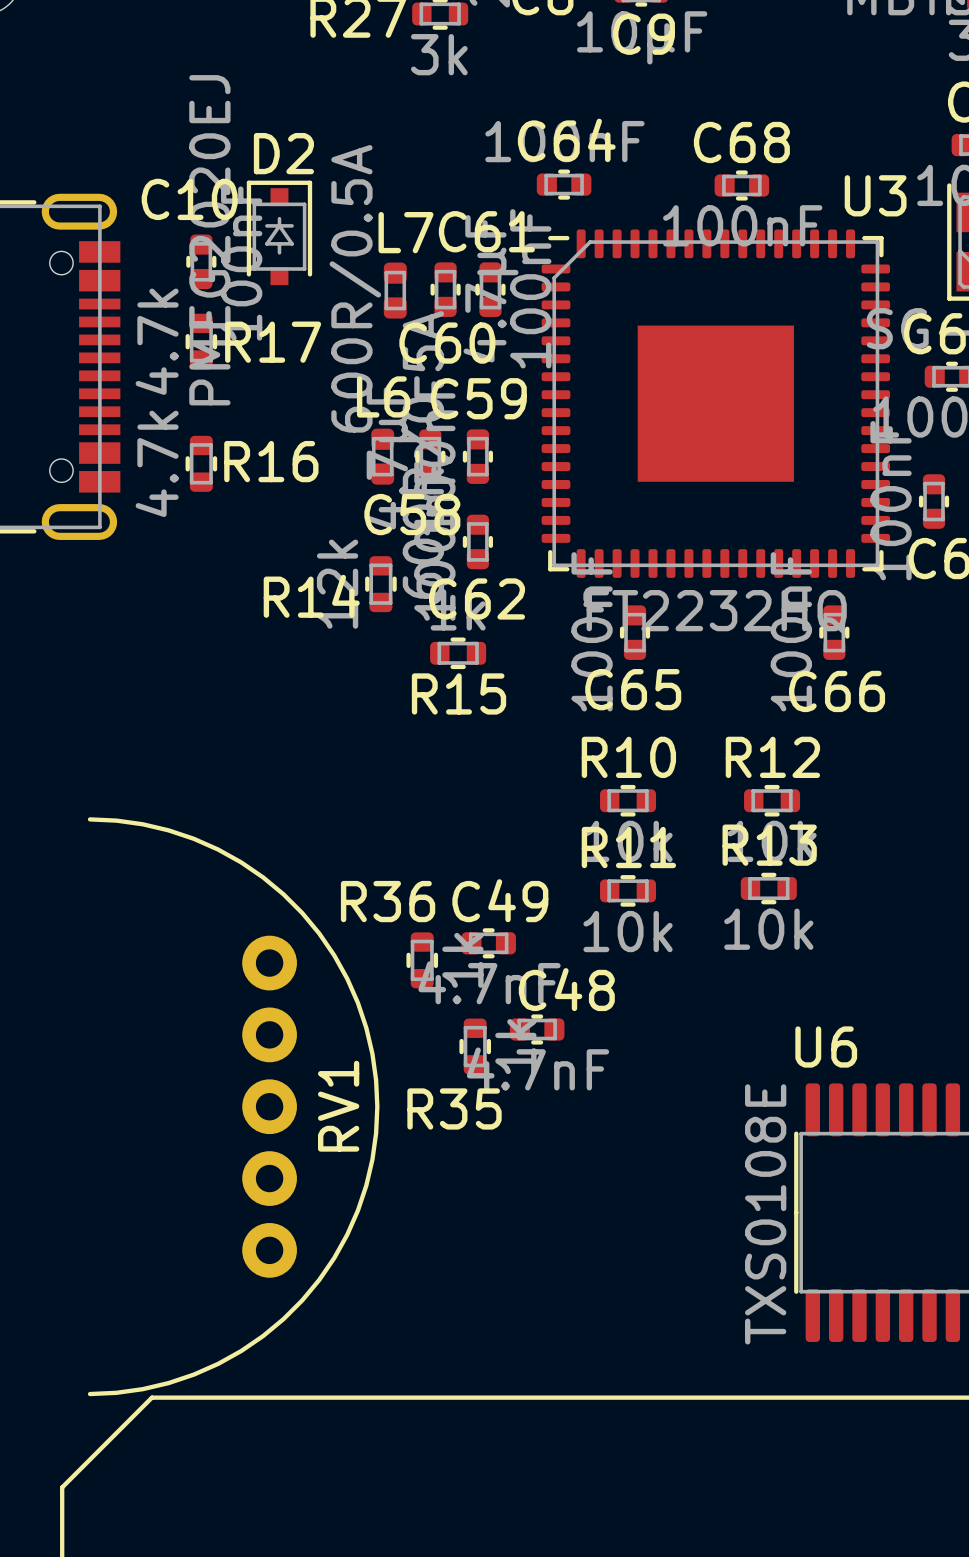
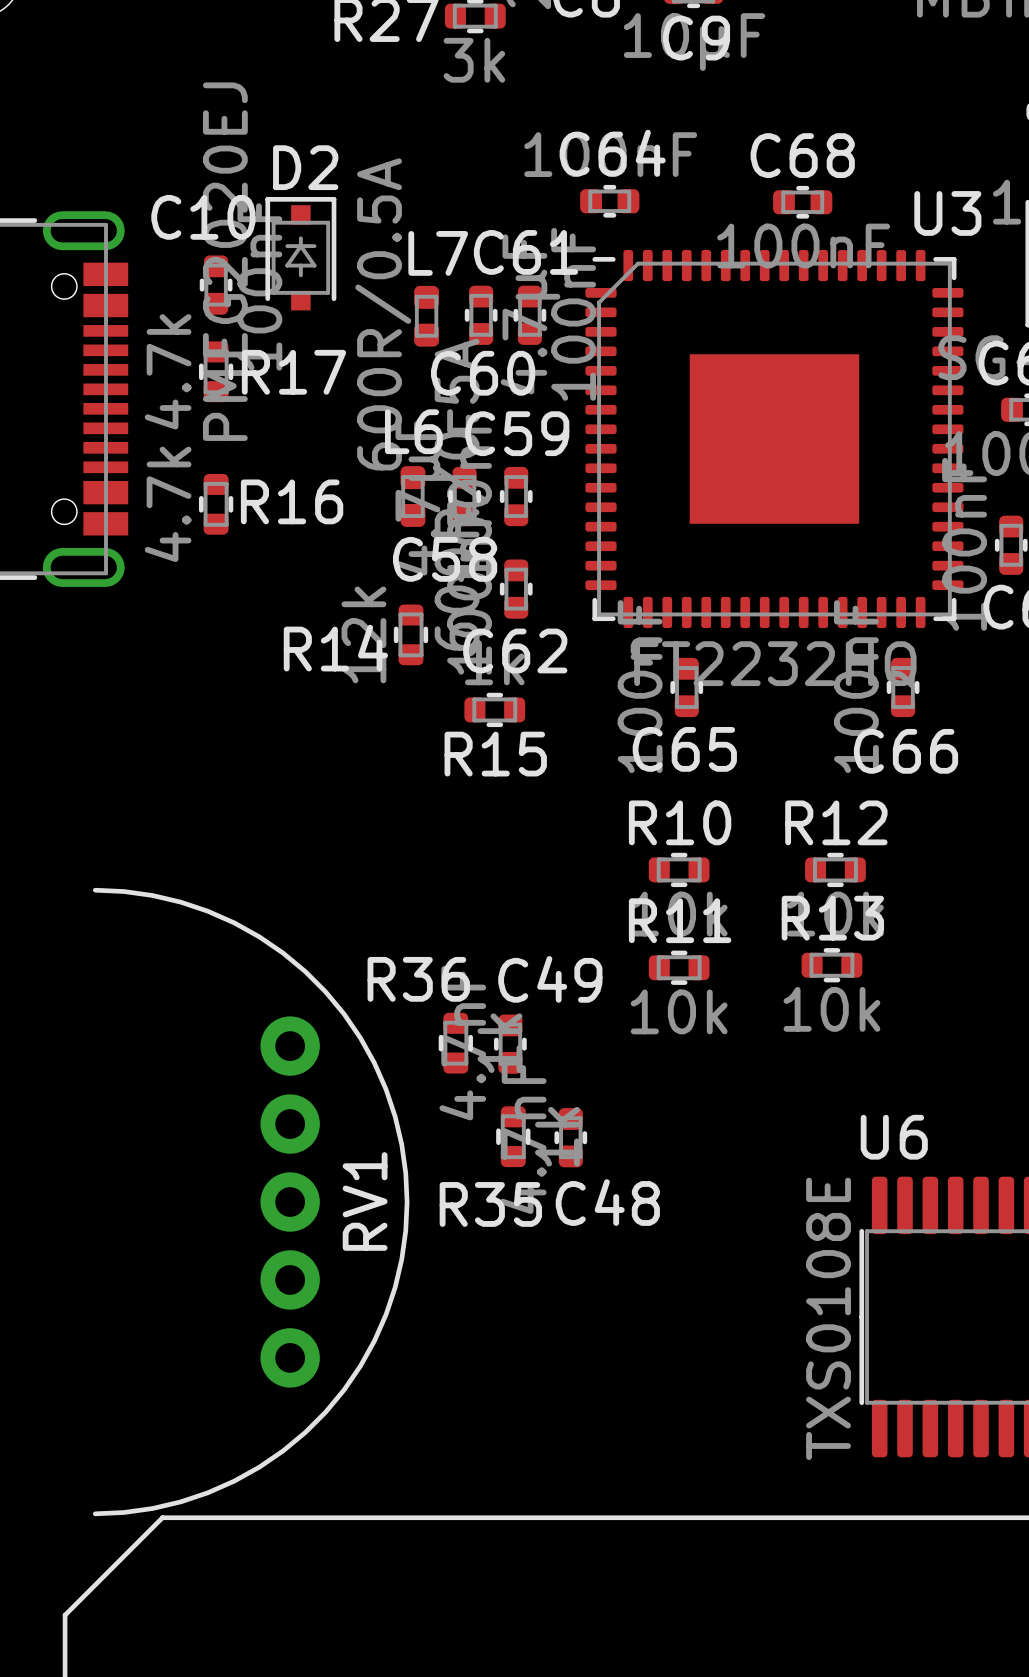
C49 rotation: 0° (488, 943) -> 90° clockwise (510, 1044)
C48 rotation: 0° (537, 1029) -> 90° clockwise (570, 1137)

